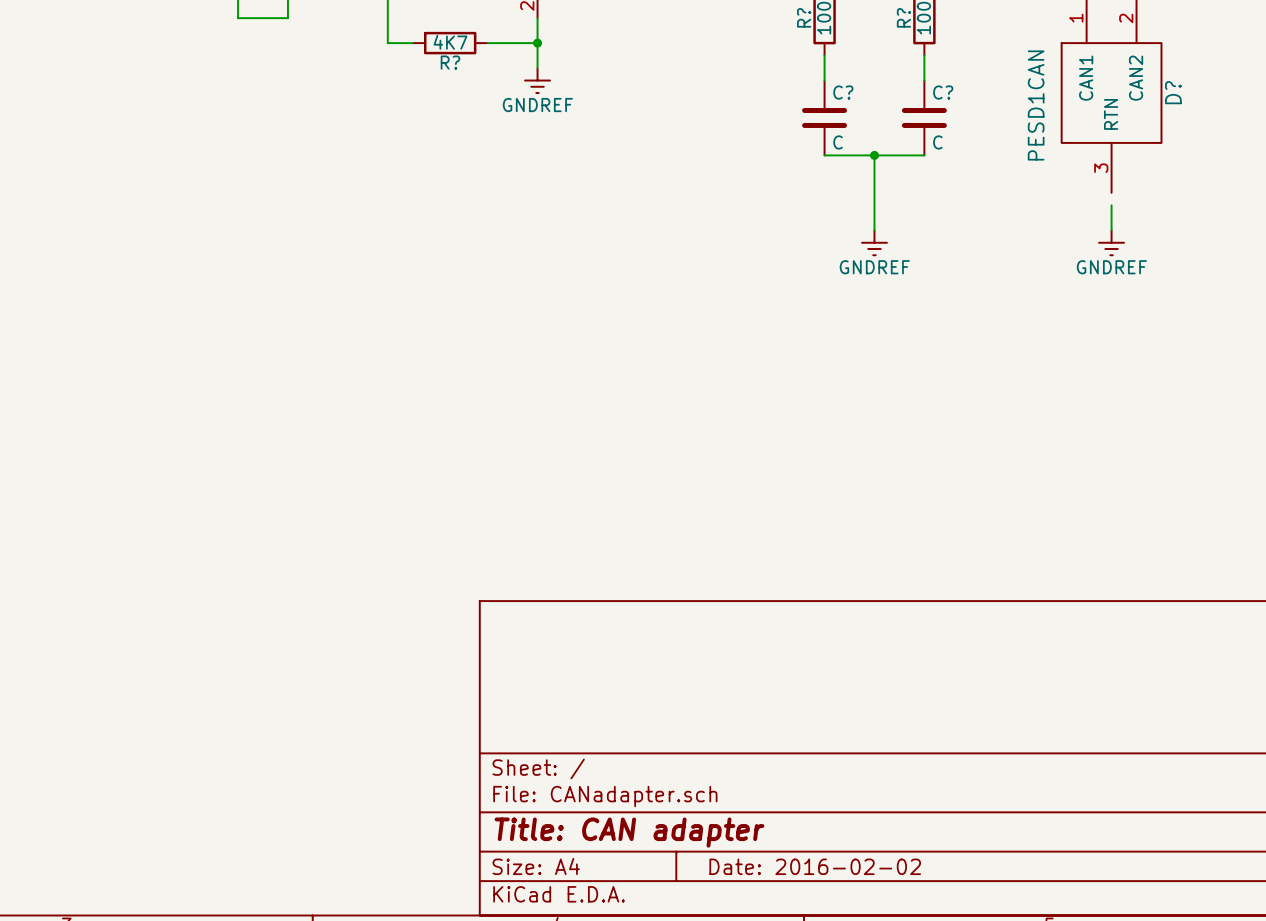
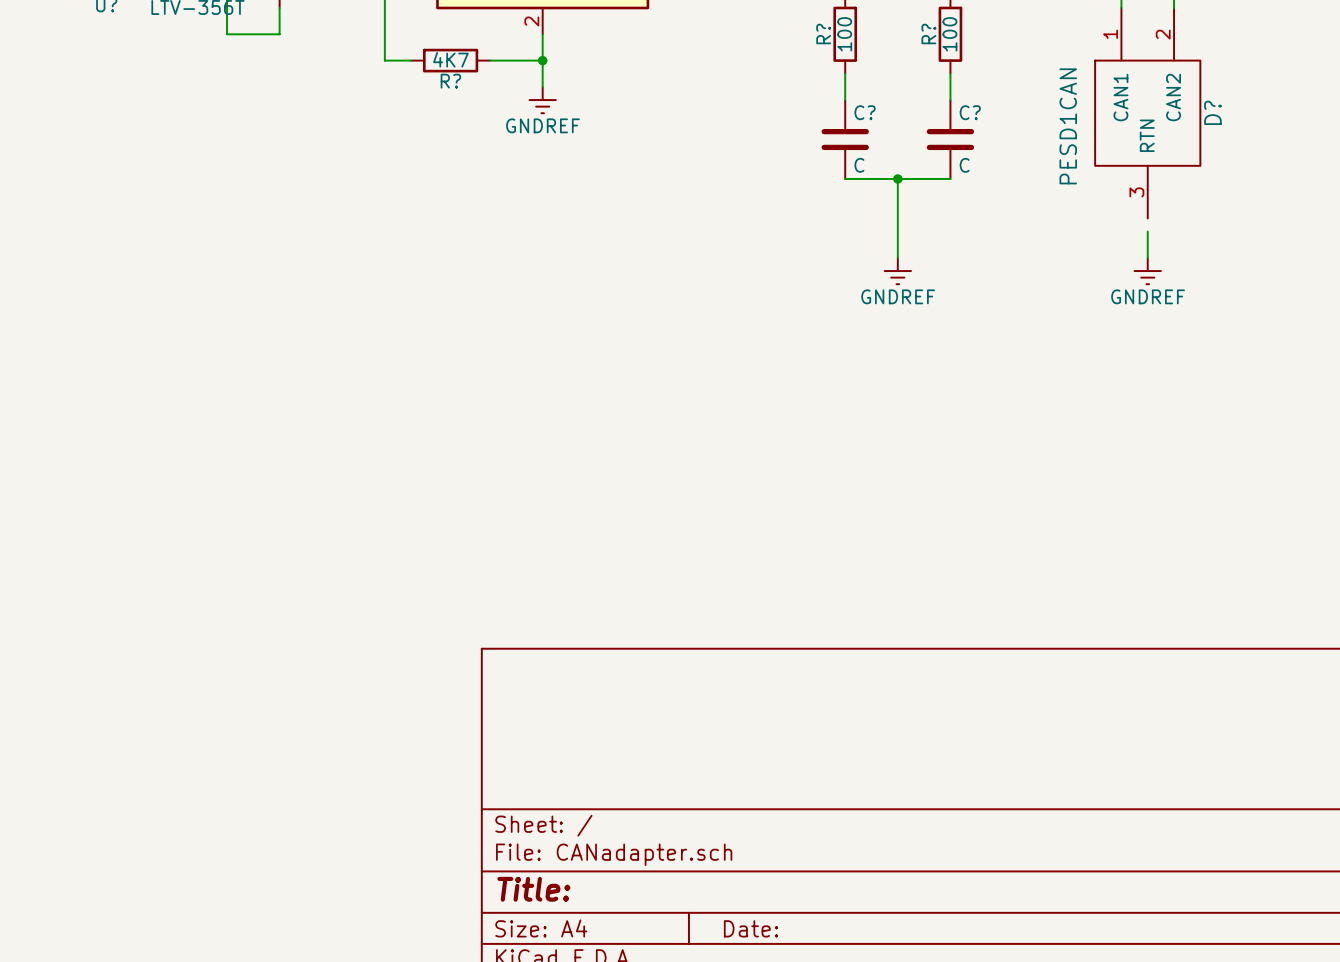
title block: Title: CAN adapter (629, 832) -> Title: (533, 889)
title block: Date: 2016-02-02 (815, 866) -> Date: (751, 928)

